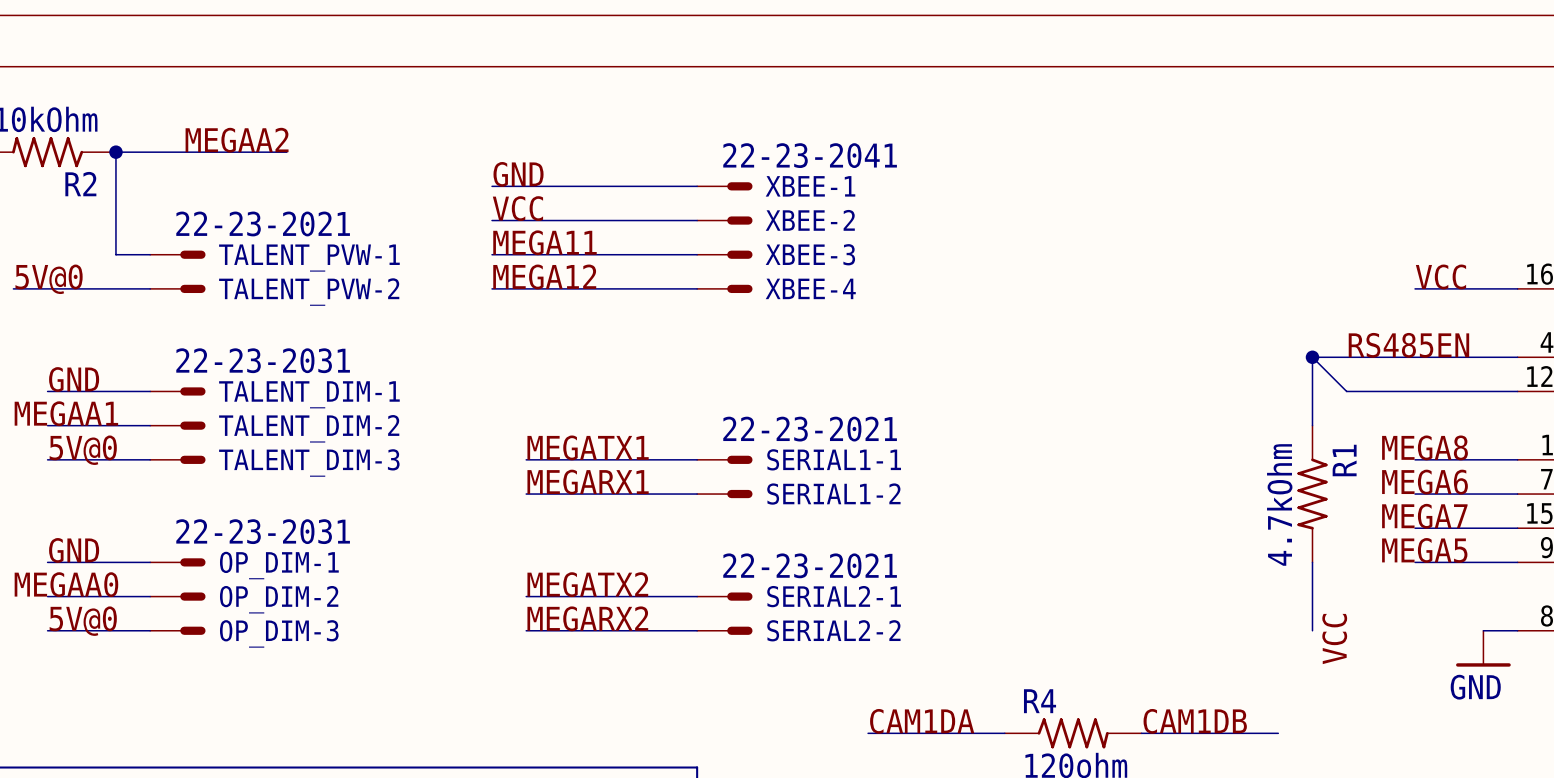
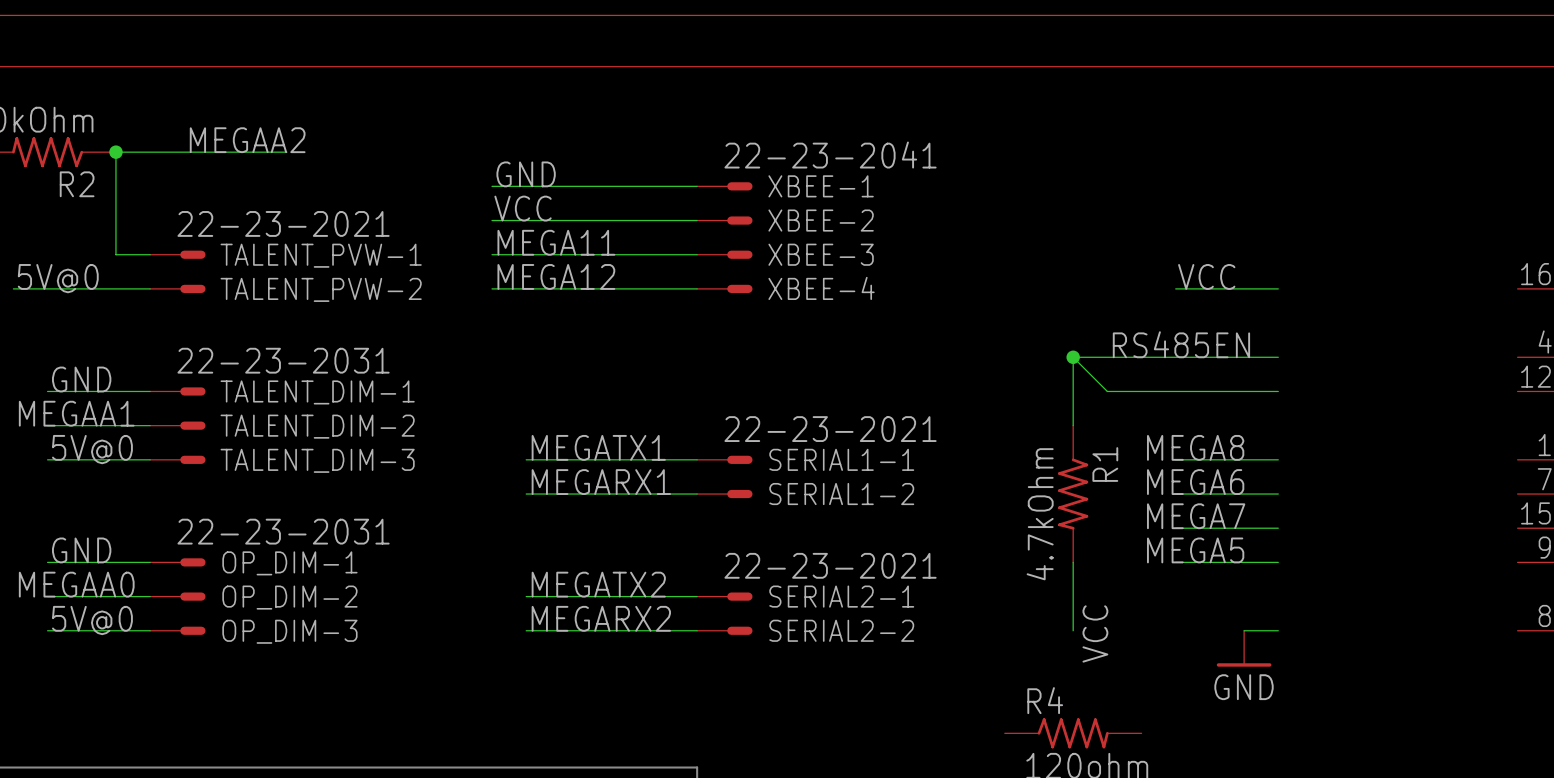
label: none -> VCC (1206, 276)
label: VCC (1440, 276) -> none
wire: (1415, 288) (1517, 288) -> (1175, 288) (1278, 288)
label position: RS485EN (1408, 345) -> RS485EN (1181, 344)
junction: none -> (1073, 357)
wire: (1312, 357) (1517, 357) -> (1073, 357) (1278, 357)
wire: (1312, 357) (1312, 425) -> (1073, 357) (1073, 425)
wire: (1312, 357) (1346, 391) (1517, 391) -> (1073, 357) (1107, 391) (1278, 391)
junction: (1312, 357) -> none
label position: MEGA8 (1425, 447) -> MEGA8 (1195, 447)
wire: (1415, 459) (1517, 459) -> (1175, 459) (1278, 459)
label position: MEGA6 (1424, 482) -> MEGA6 (1195, 482)
R1 position: (1312, 494) -> (1073, 494)
wire: (1415, 494) (1517, 494) -> (1175, 494) (1278, 494)
label position: MEGA7 (1424, 516) -> MEGA7 (1196, 516)
wire: (1415, 528) (1517, 528) -> (1175, 528) (1278, 528)
label position: MEGA5 (1424, 550) -> MEGA5 (1195, 550)
wire: (1312, 562) (1312, 630) -> (1073, 562) (1073, 630)
wire: (1415, 562) (1517, 562) -> (1175, 562) (1278, 562)
wire: (1483, 630) (1517, 630) -> (1244, 630) (1278, 630)
label: none -> VCC (1095, 633)
label: VCC (1334, 639) -> none
power symbol position: GND (1483, 648) -> GND (1244, 648)
label: CAM1DA (922, 721) -> none
label: CAM1DB (1195, 721) -> none
wire: (868, 733) (1004, 733) -> none
wire: (1141, 733) (1278, 733) -> none

